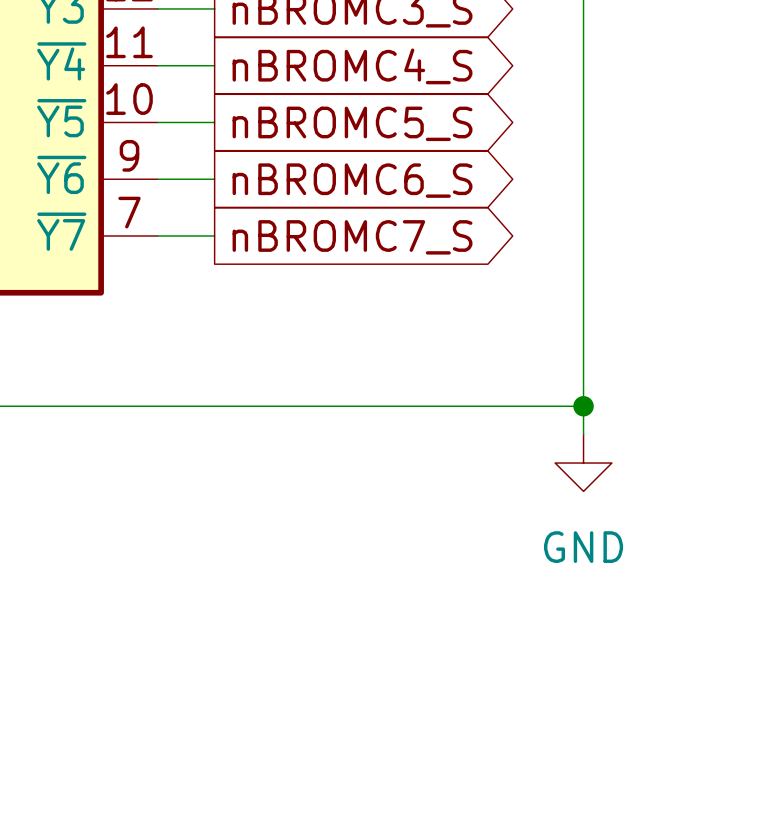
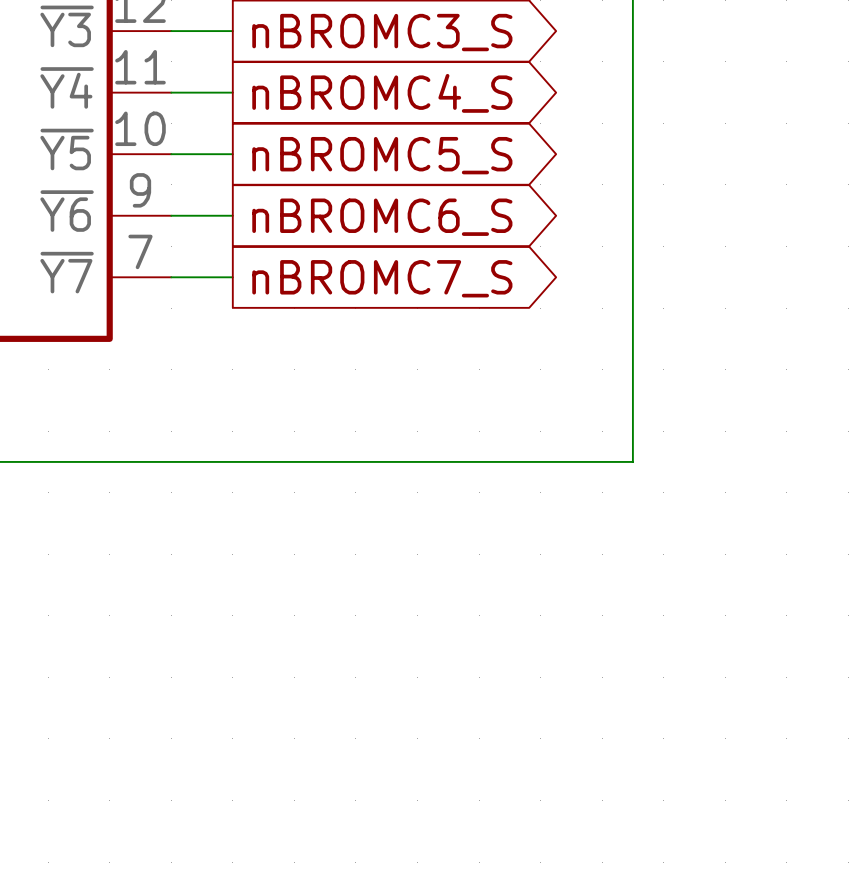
wire: (583, 406) (583, 434) -> none
junction: (583, 406) -> none
power symbol: GND (583, 463) -> none

